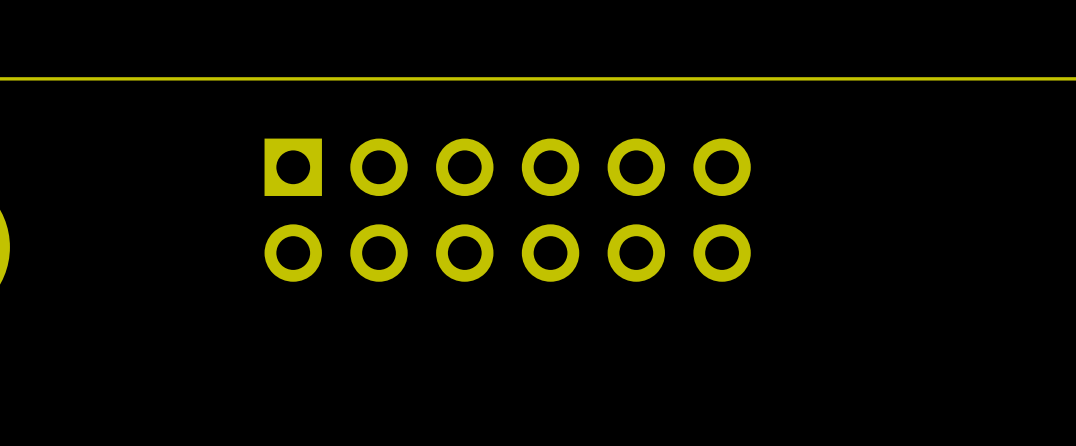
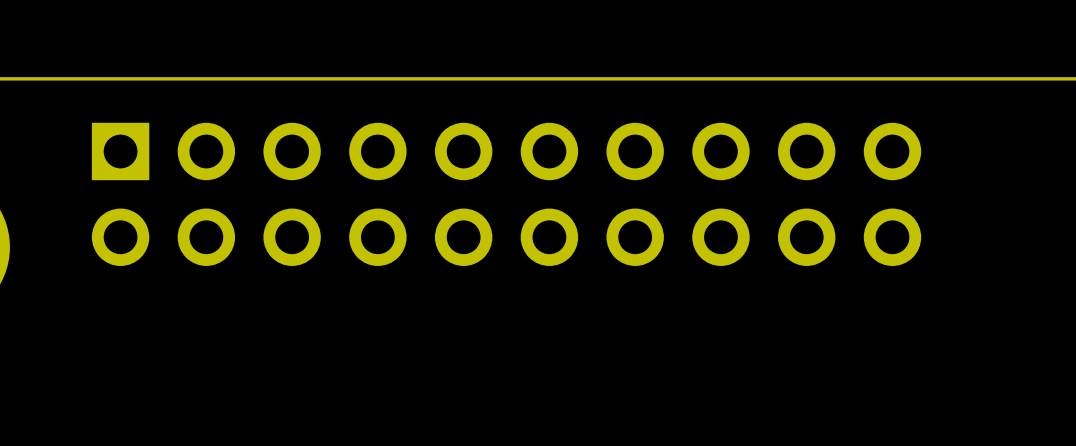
part footprint: [264, 138, 751, 282] -> [91, 122, 922, 266]

